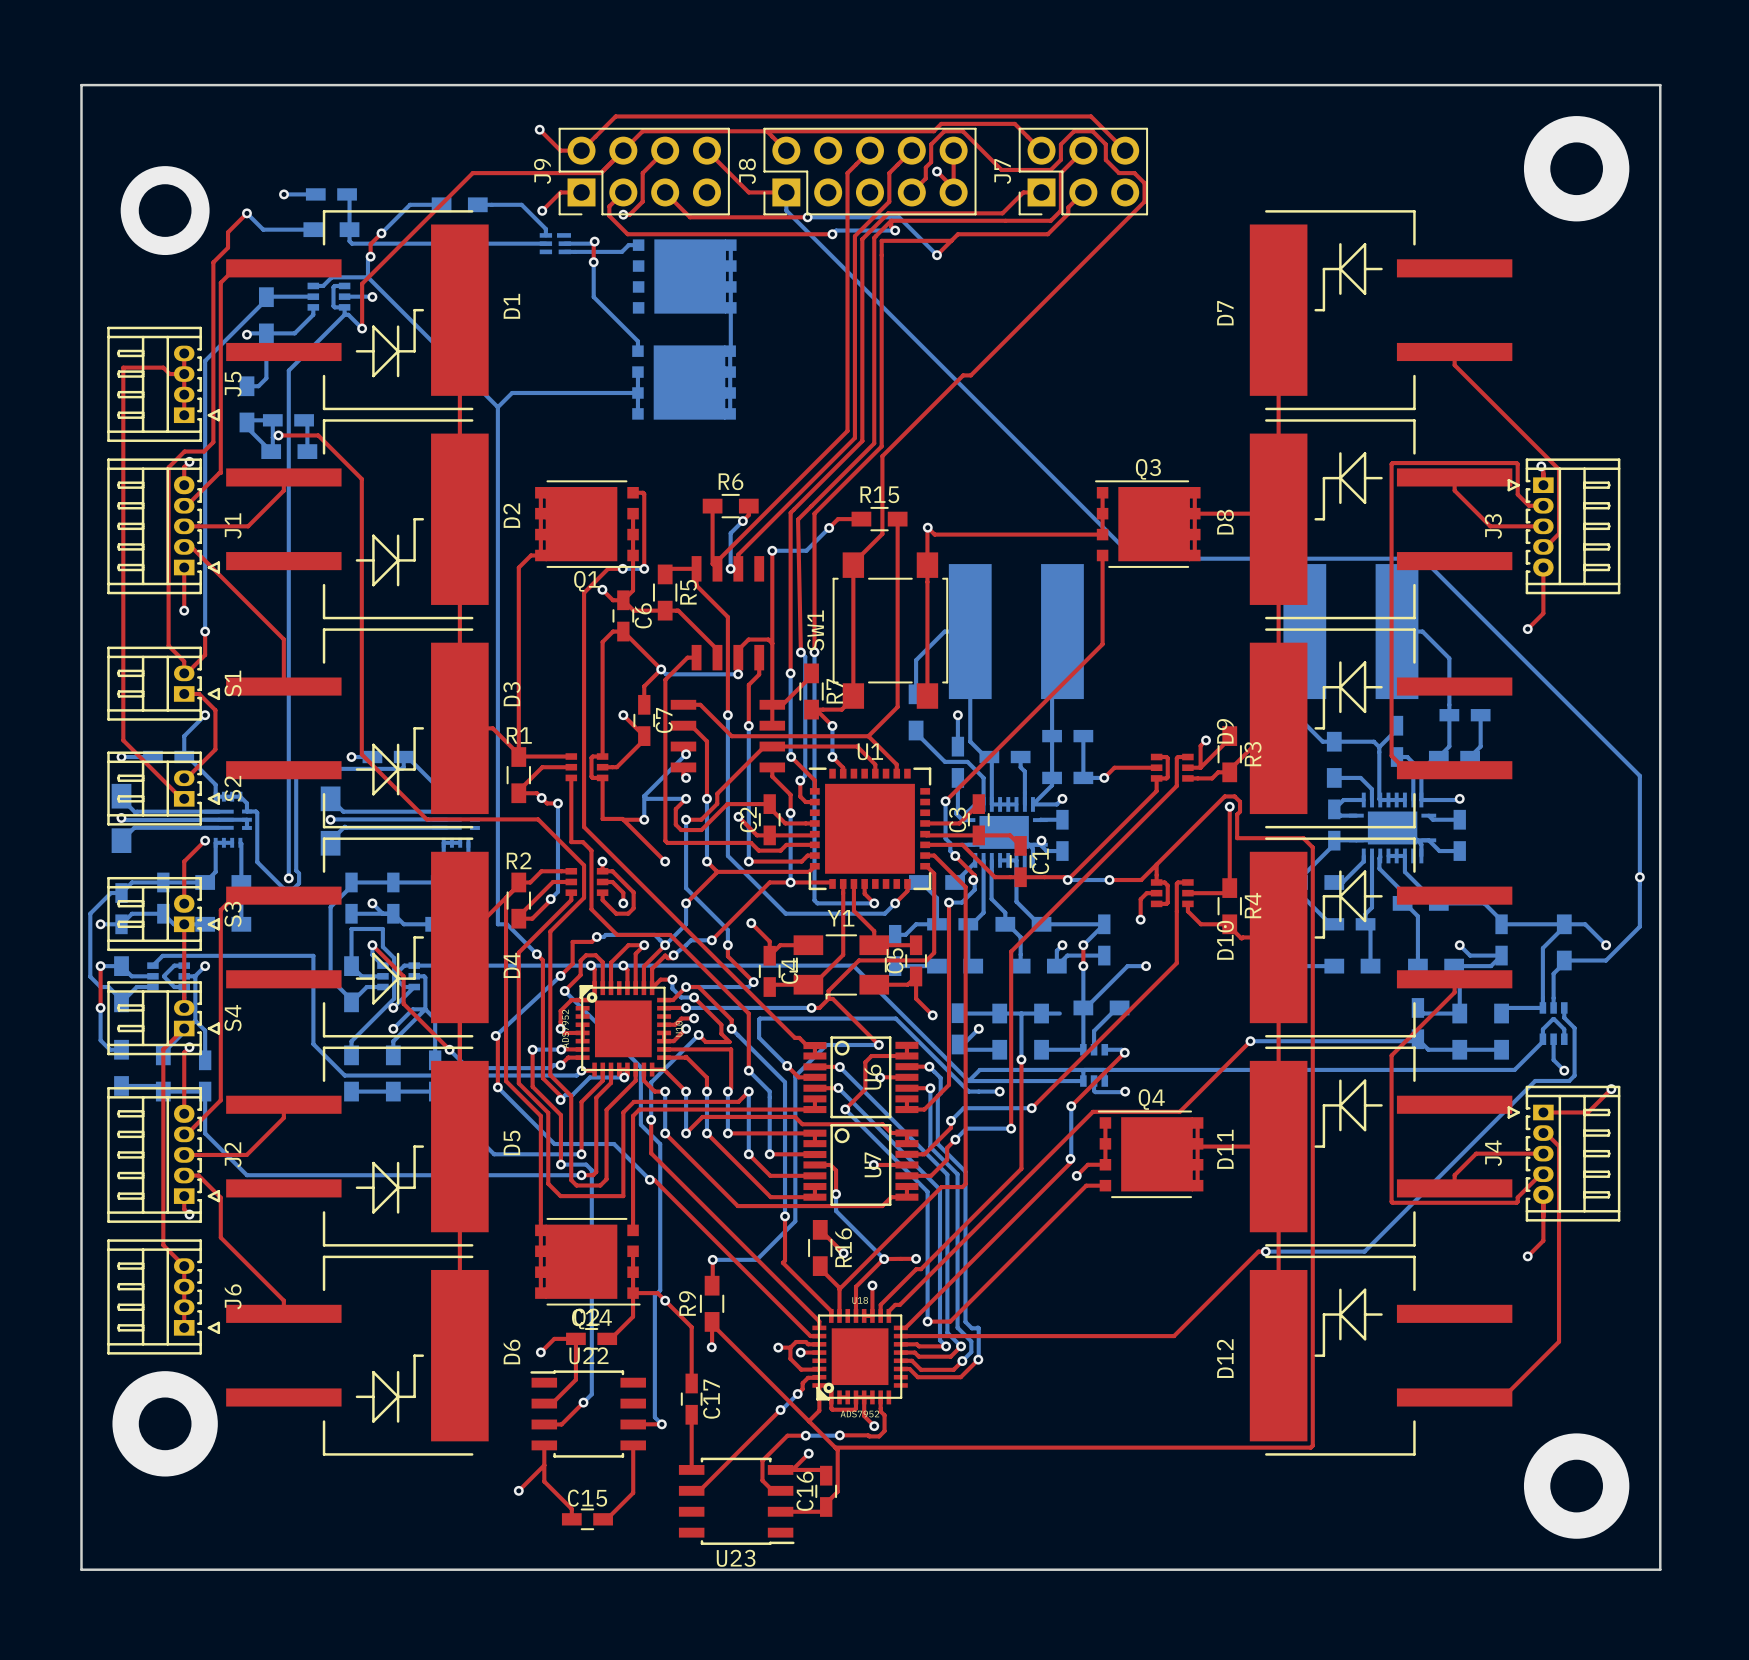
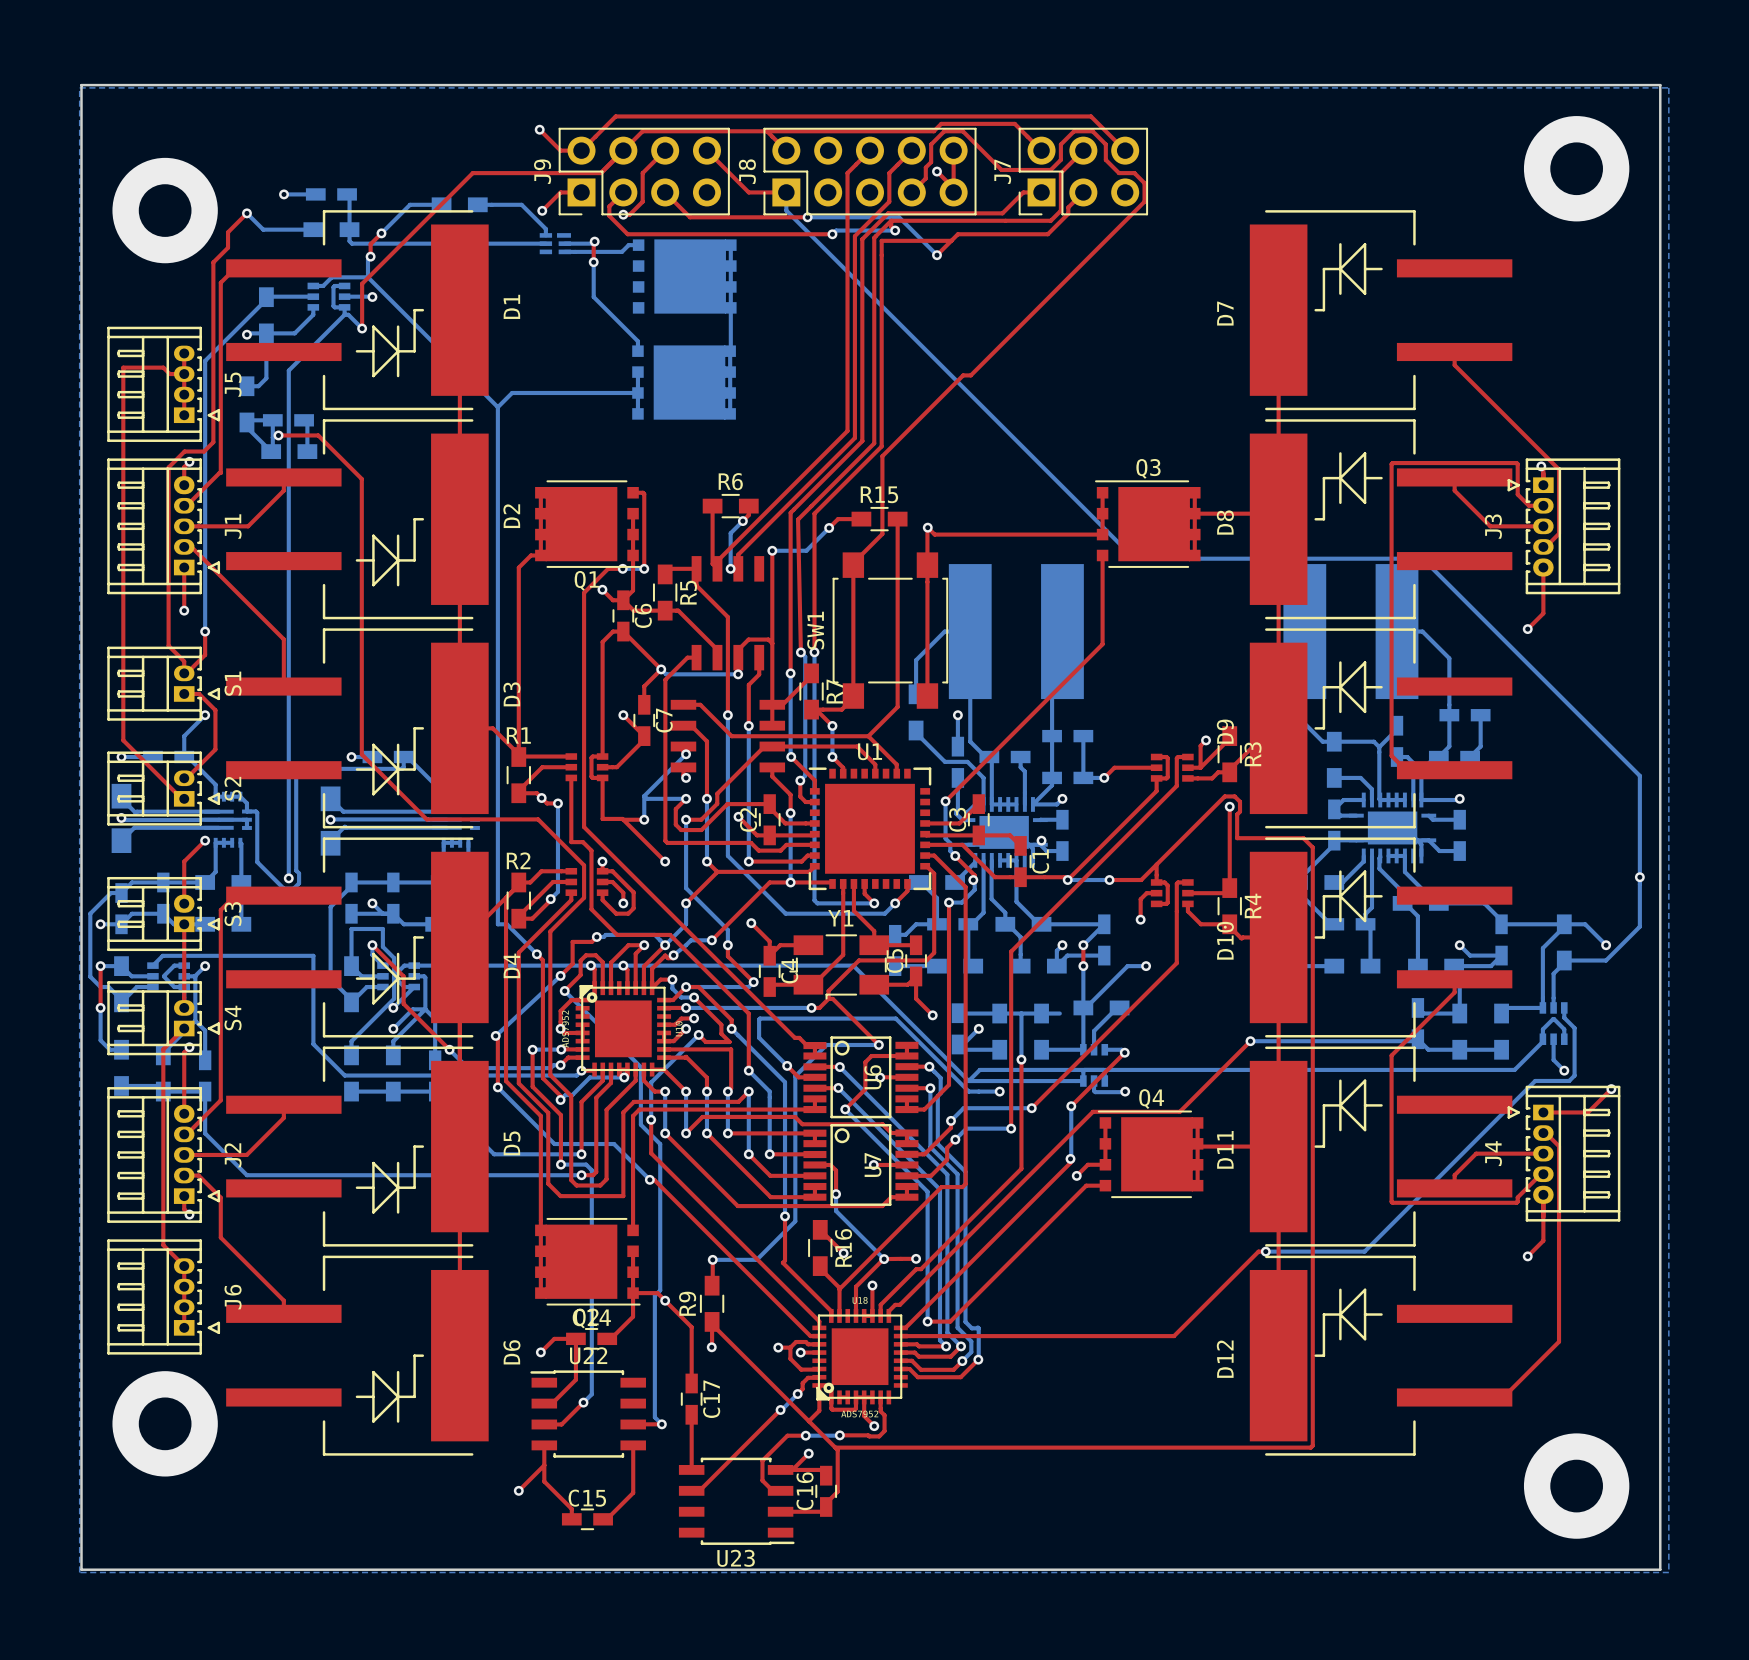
bottom zone outline: none -> (79, 87) (79, 1572) (1668, 1572) (1668, 87) (79, 87)
via size: [120, 166, 210, 256] -> [112, 157, 218, 264]

